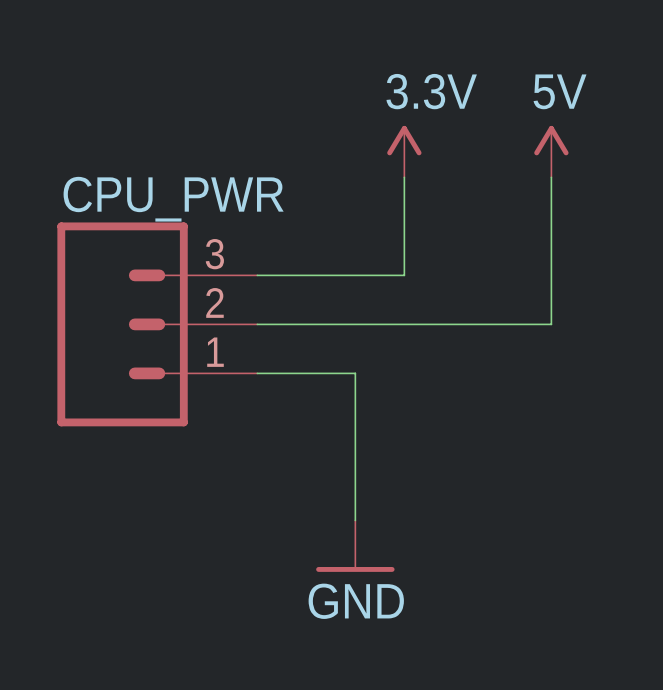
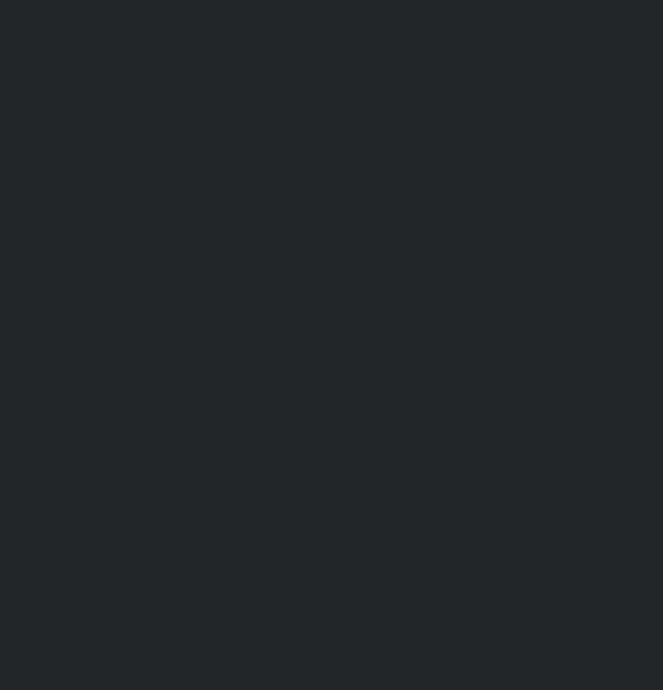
power symbol: 3.3V (404, 151) -> none
power symbol: 5V (551, 151) -> none
wire: (404, 177) (404, 275) (257, 275) -> none
wire: (551, 177) (551, 324) (257, 324) -> none
CPU_PWR: (157, 324) -> none
wire: (257, 373) (355, 373) (355, 520) -> none
power symbol: GND (355, 546) -> none

